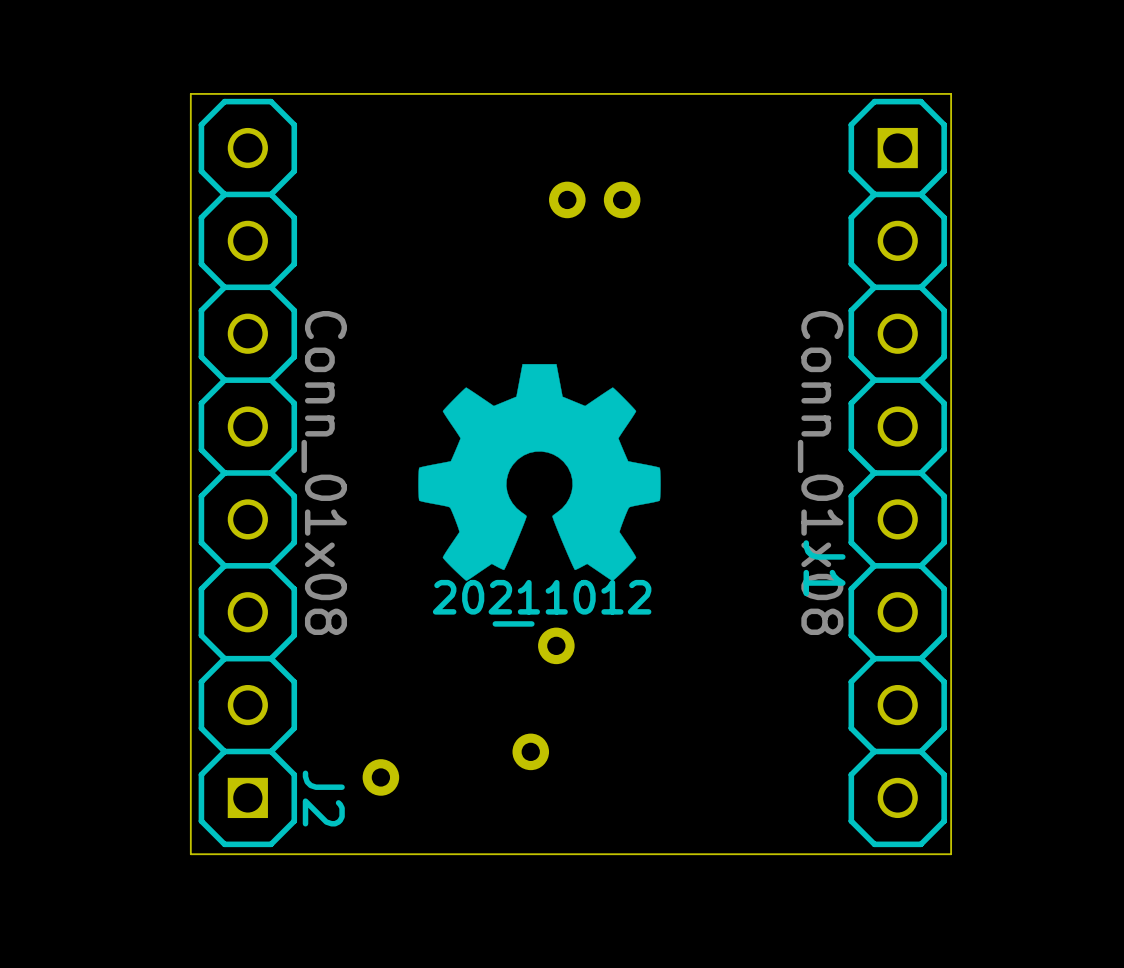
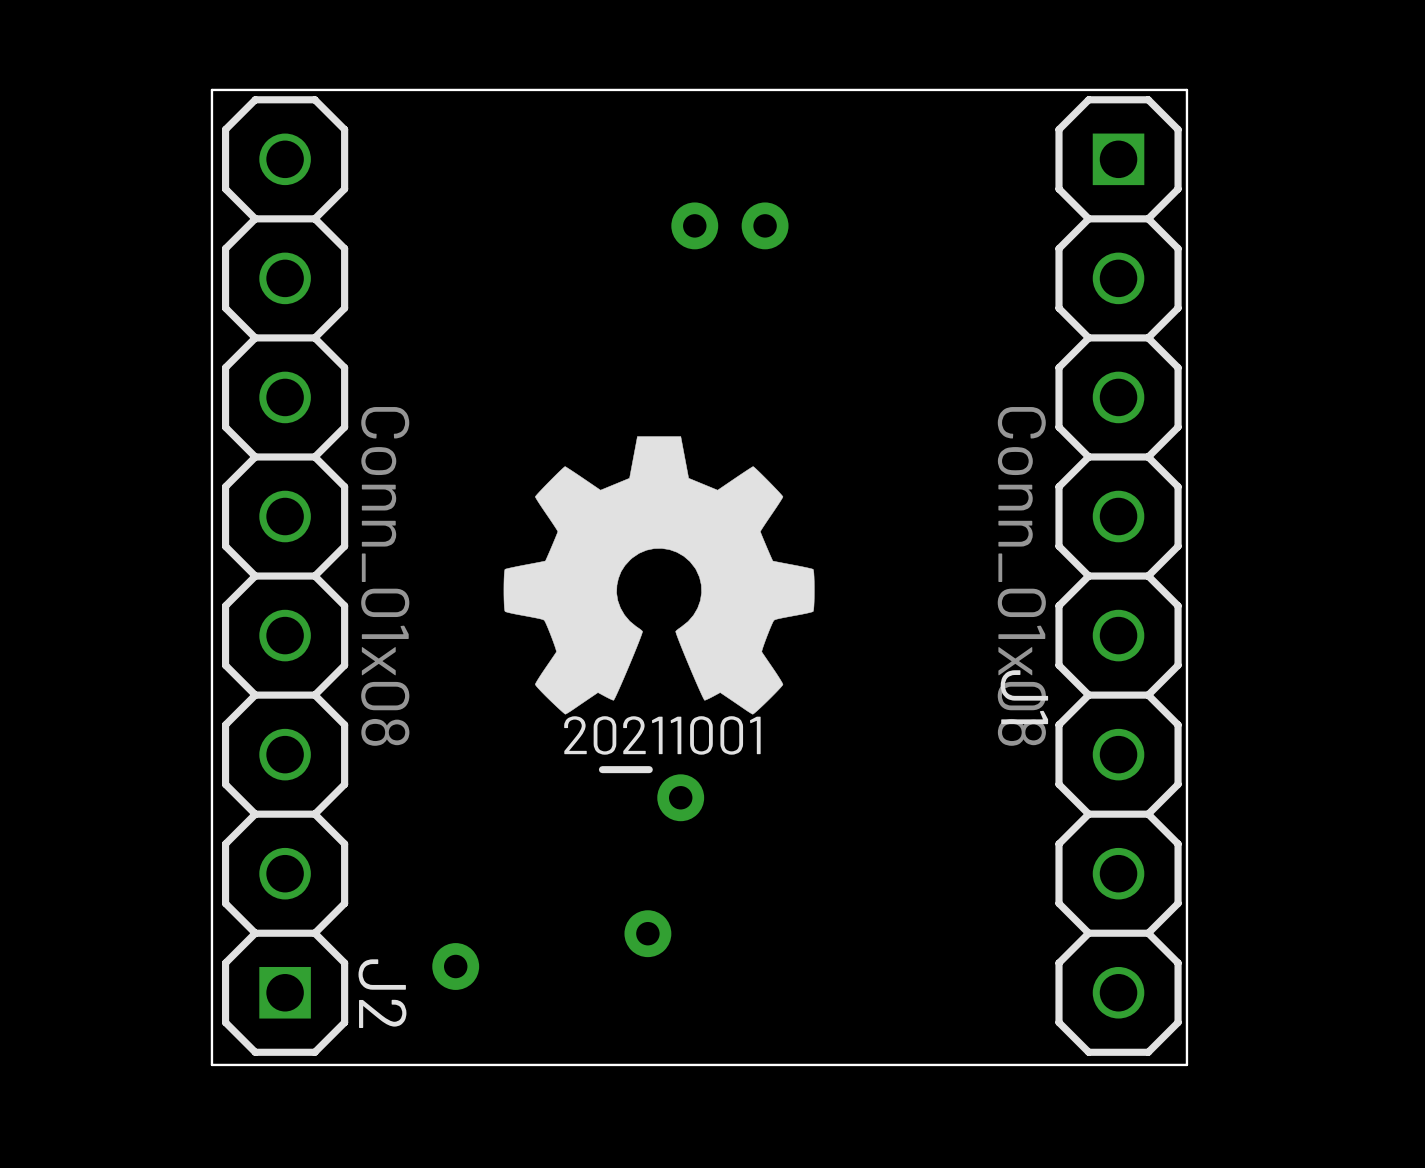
drawing shape: [432, 579, 652, 627] -> [564, 716, 761, 774]

